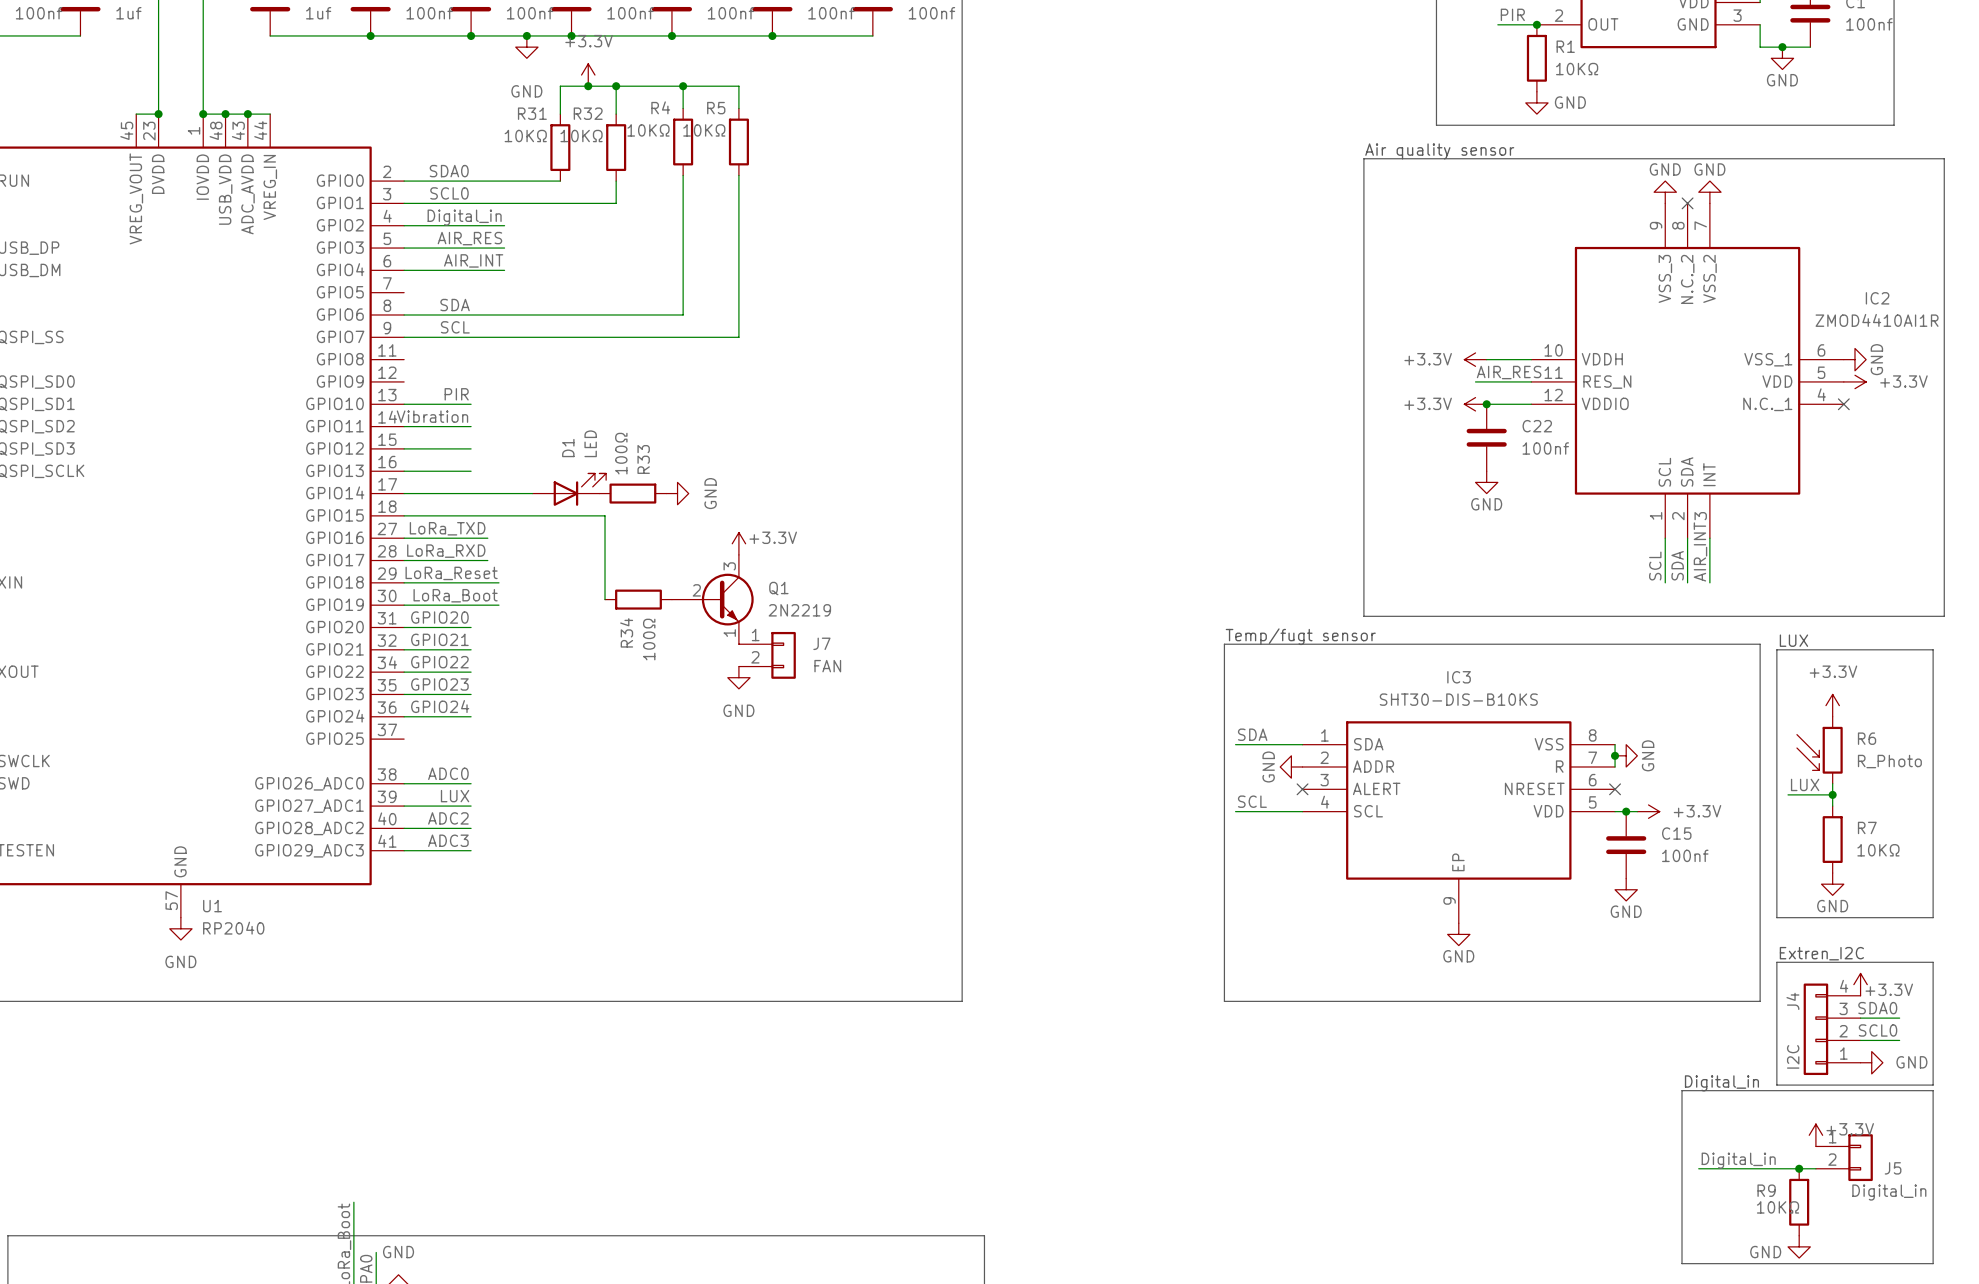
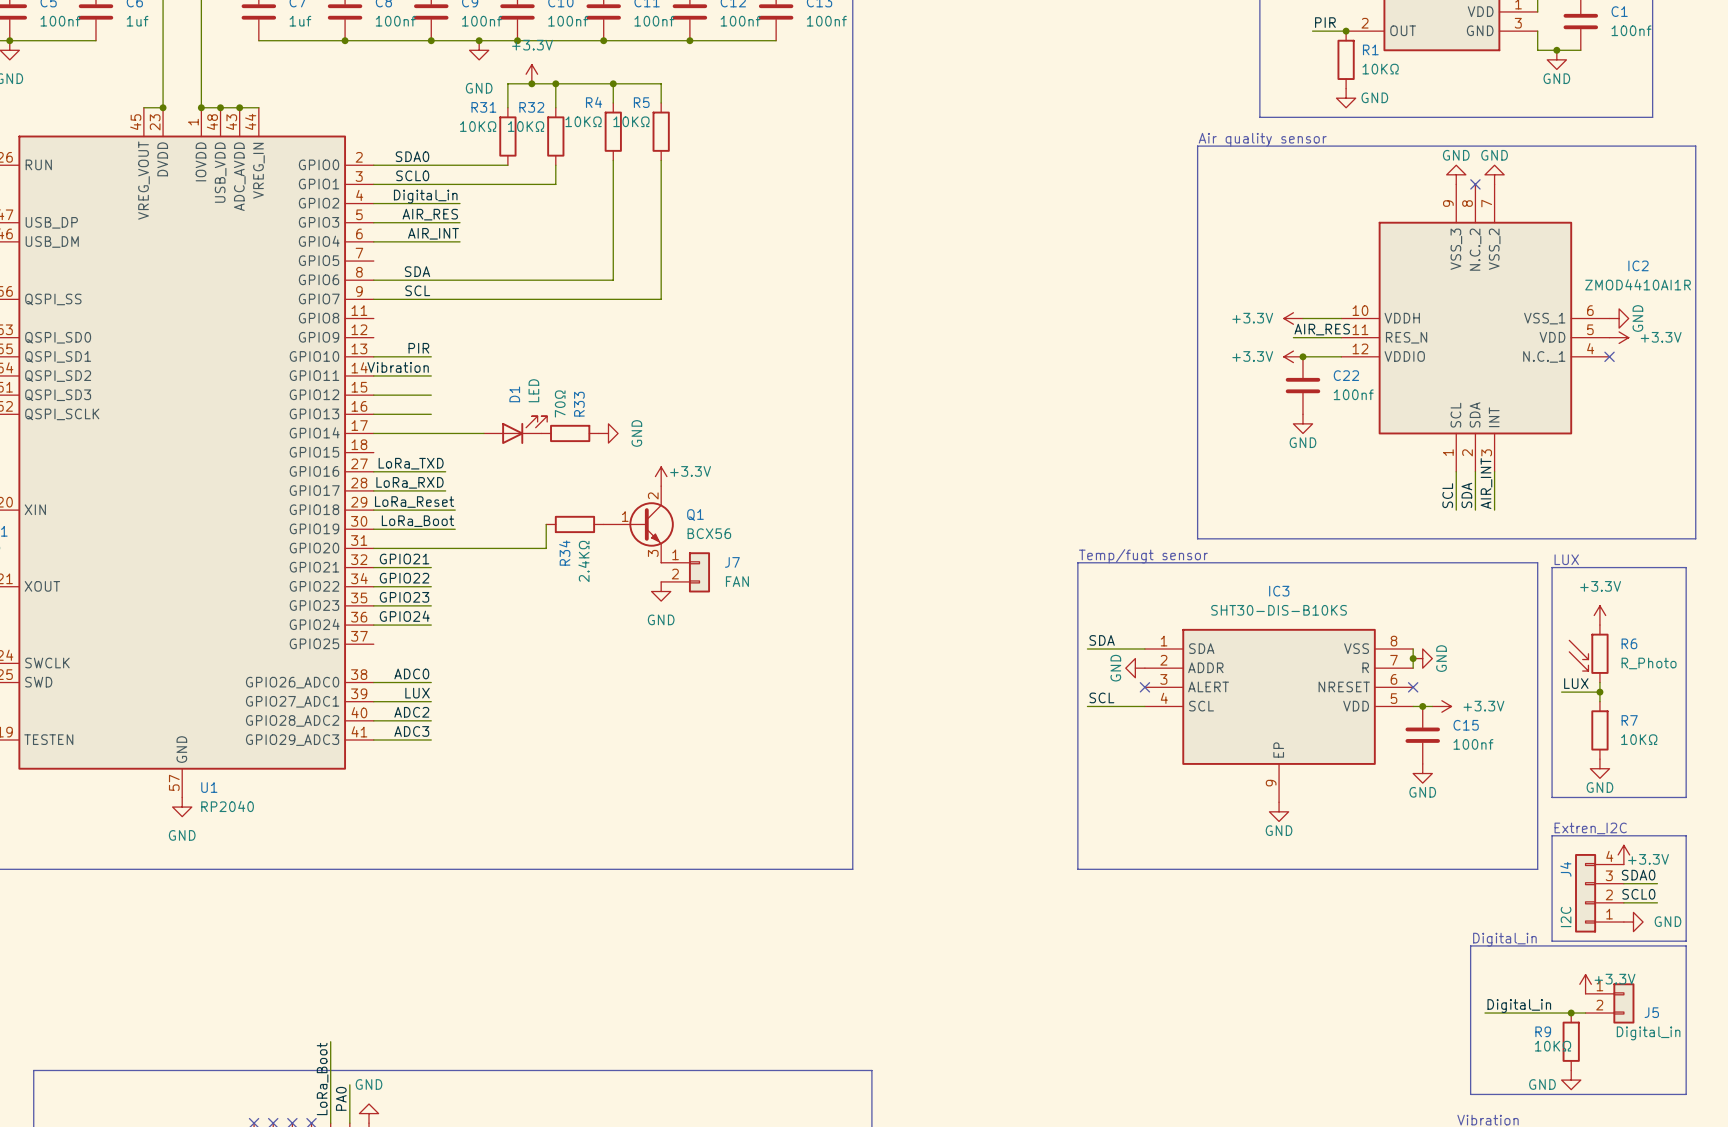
R33 value: 100Ω (621, 453) -> 70Ω (560, 403)
wire: (404, 515) (605, 515) (605, 599) -> (431, 548) (546, 548) (546, 524)
Q1 pin number: 3 (729, 566) -> 2 (653, 495)
Q1 pin number: 2 (696, 590) -> 1 (625, 516)
Q1 value: 2N2219 (799, 610) -> BCX56 (709, 533)
label: GPIO20 (439, 617) -> none
Q1 pin number: 1 (729, 633) -> 3 (653, 553)
R34 value: 100Ω (649, 639) -> 2.4KΩ (583, 561)

